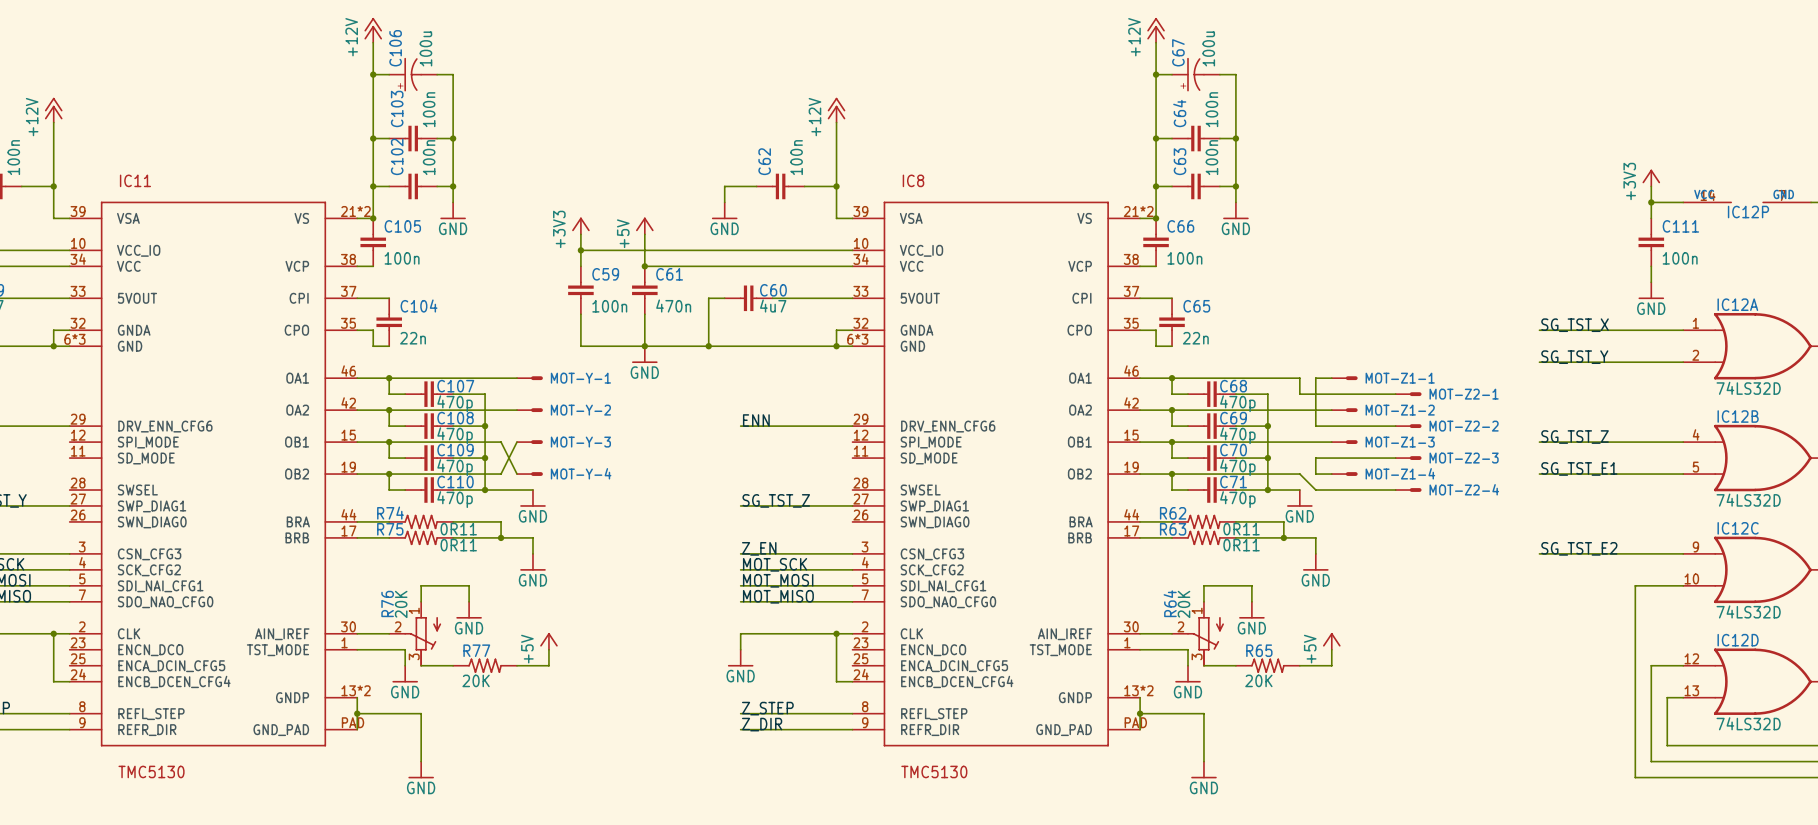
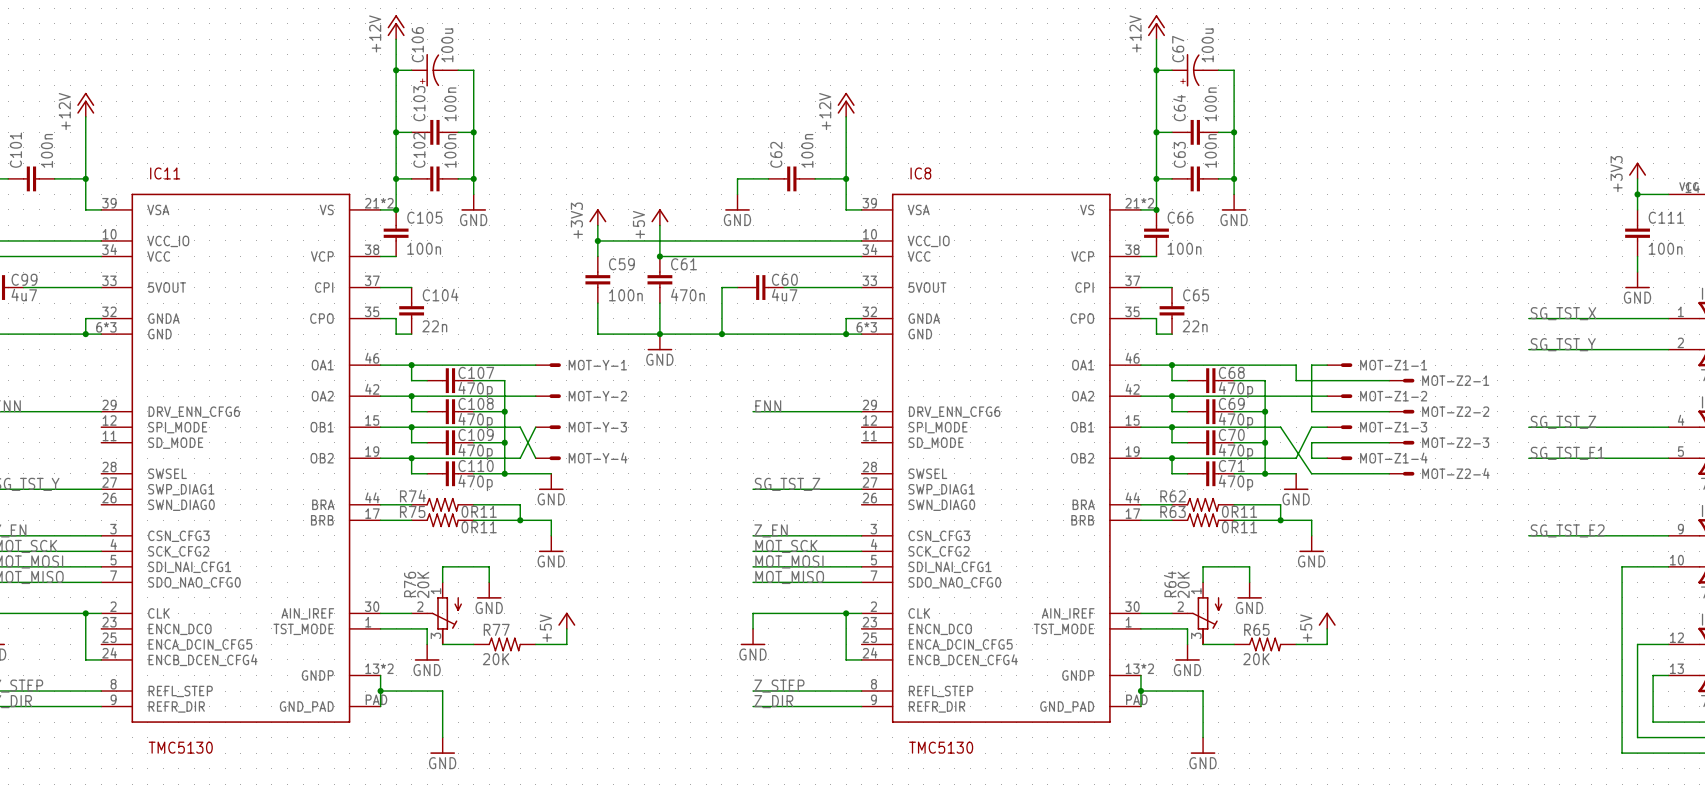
wire: (1283, 442) (1315, 442) -> (1296, 458) (1311, 427)
wire: (1299, 474) (1315, 490) -> (1280, 427) (1311, 473)

